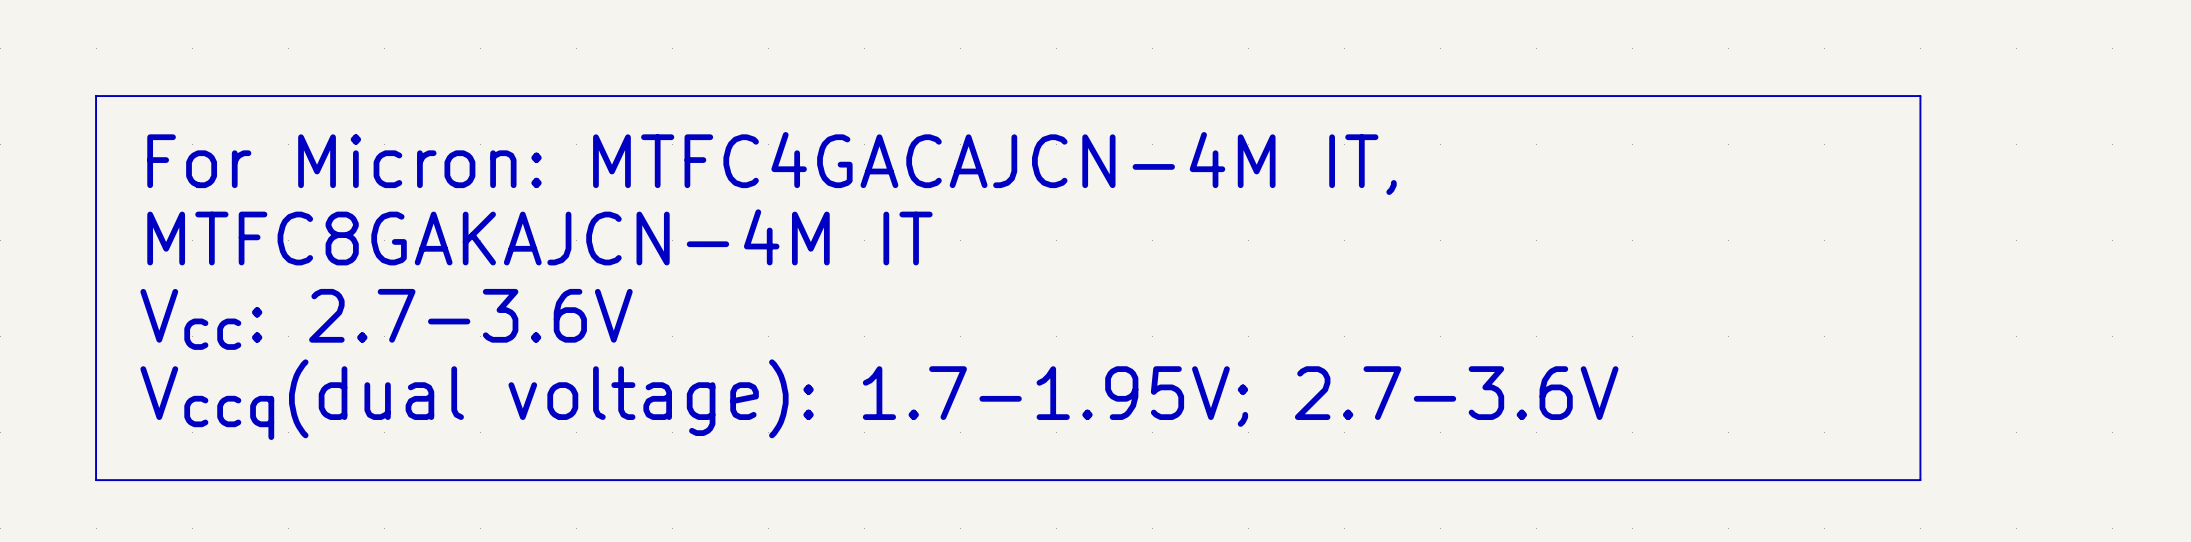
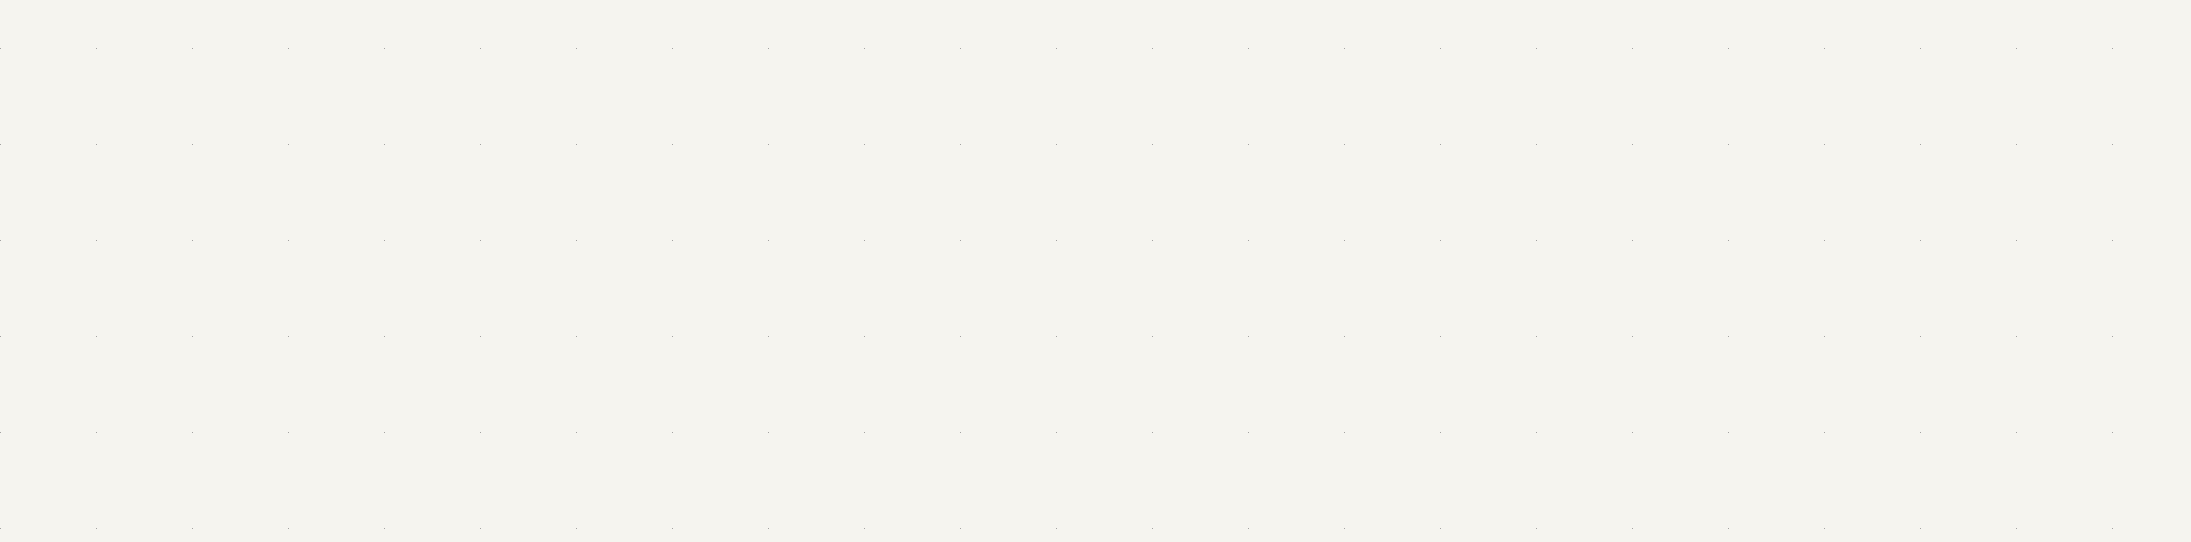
line: (96, 96) (1920, 96) (1920, 480) (96, 480) (96, 96) -> none
text: For Micron: MTFC4GACAJCN-4M IT, (771, 163) -> none
text: MTFC8GAKAJCN-4M IT (539, 237) -> none
text: Vcc: 2.7-3.6V (386, 319) -> none
text: Vccq(dual voltage): 1.7-1.95V; 2.7-3.6V (879, 399) -> none

